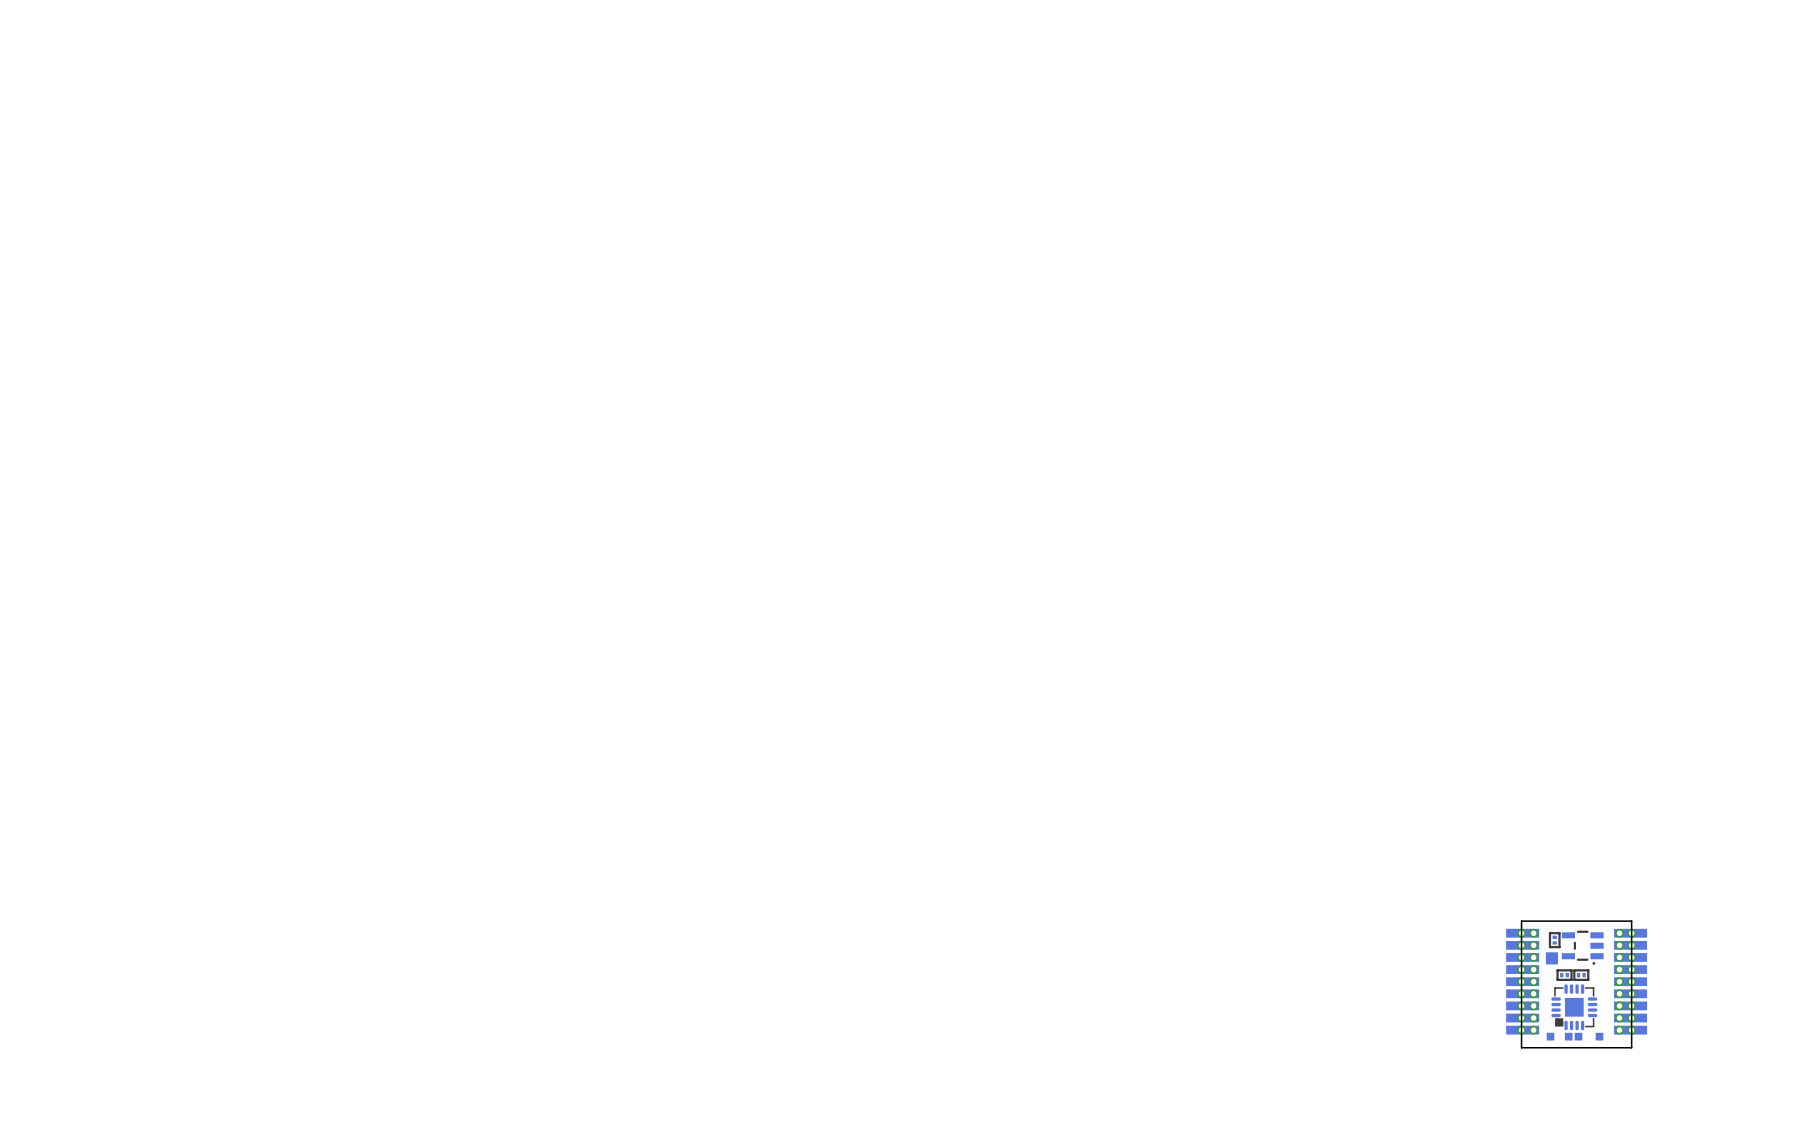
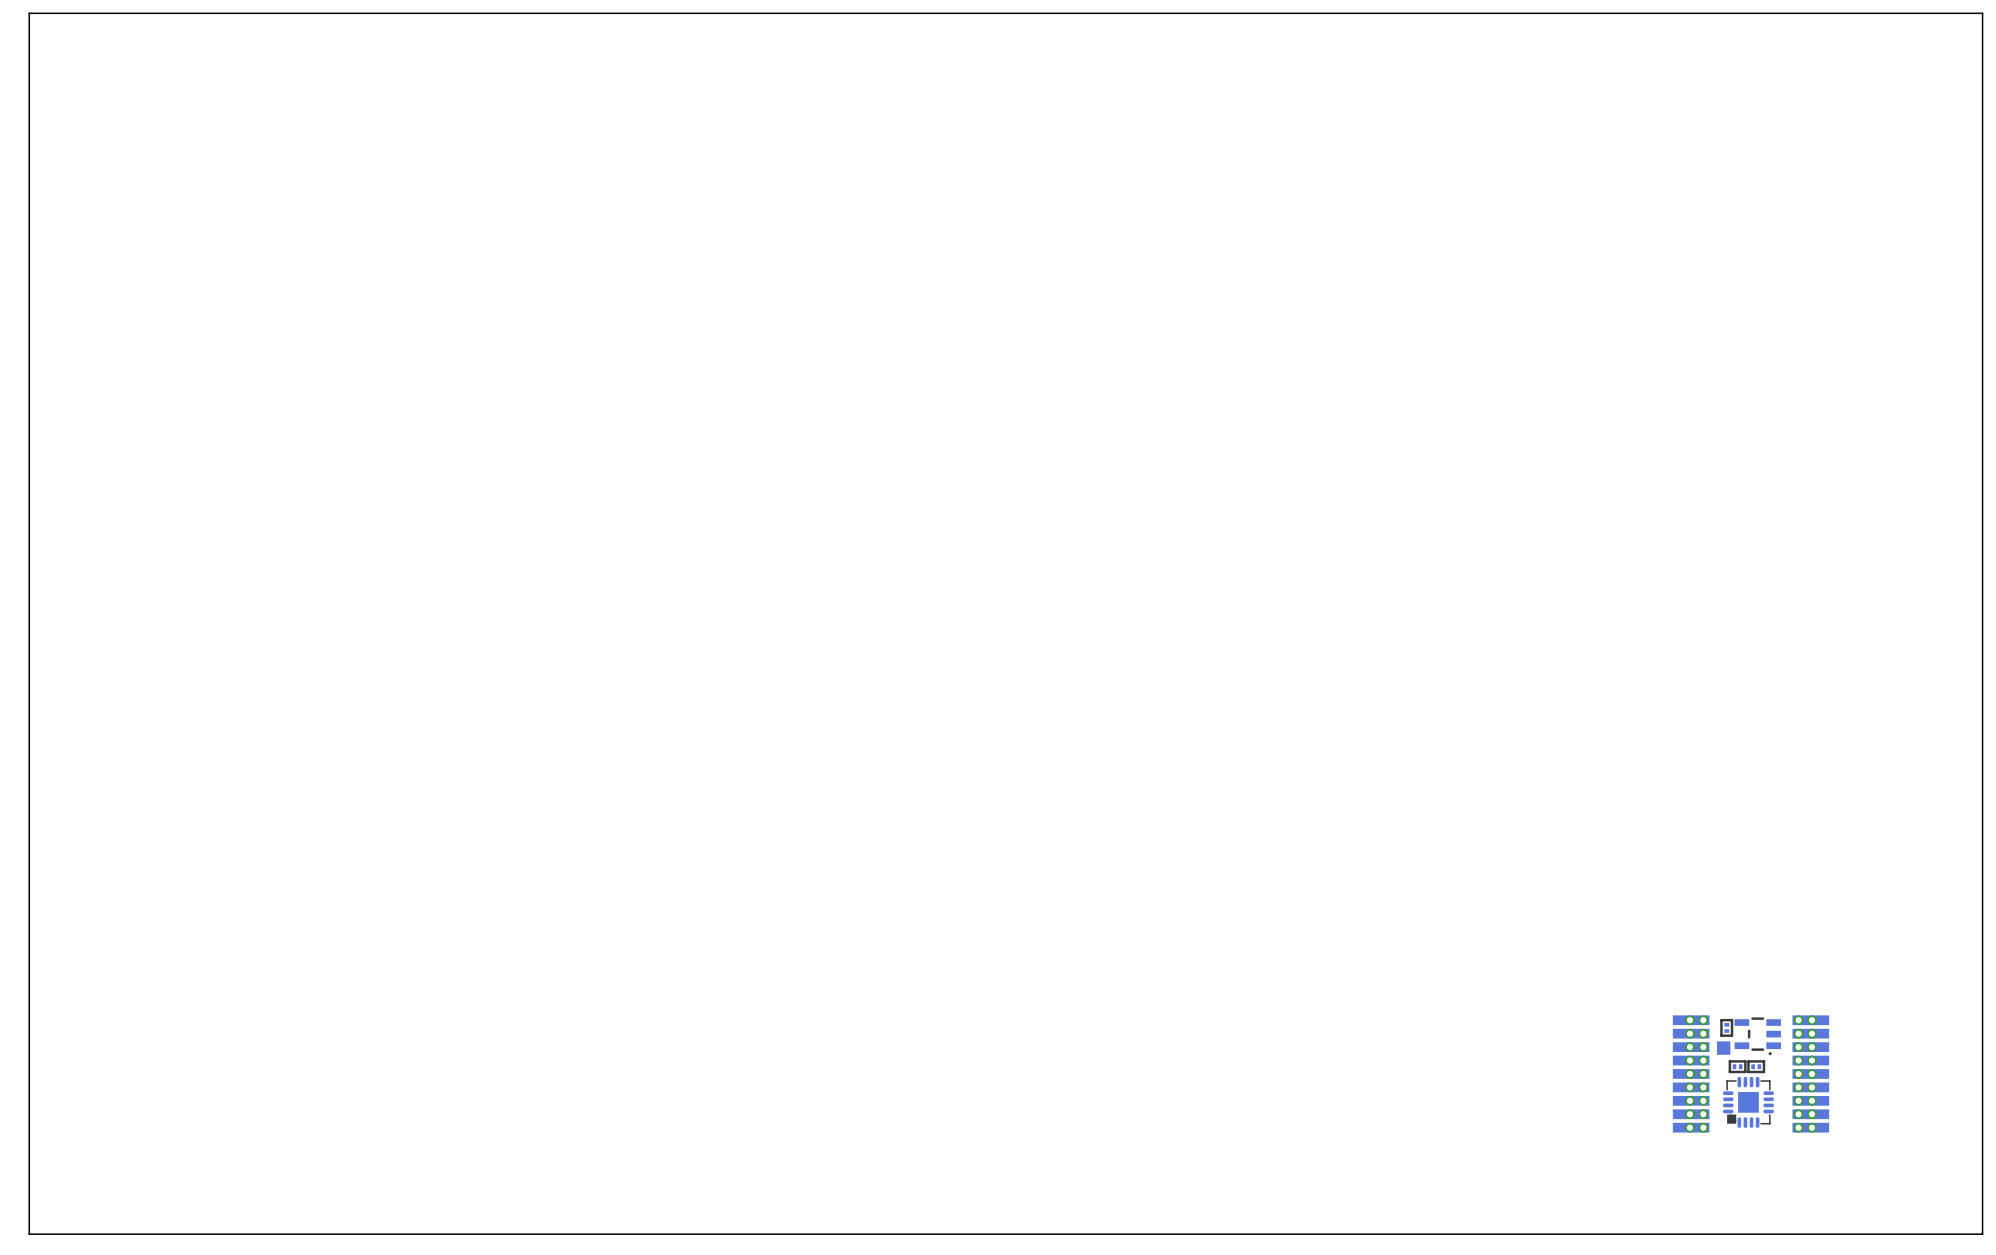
board edge: none -> (1982, 13) (29, 13) (29, 1234) (1982, 1234) (1982, 13)
board edge: (1631, 921) (1521, 921) (1521, 1047) (1631, 1047) (1631, 921) -> none
part: (1550, 1036) -> none
part: (1568, 1036) -> none
part: (1578, 1036) -> none
part: (1599, 1036) -> none

